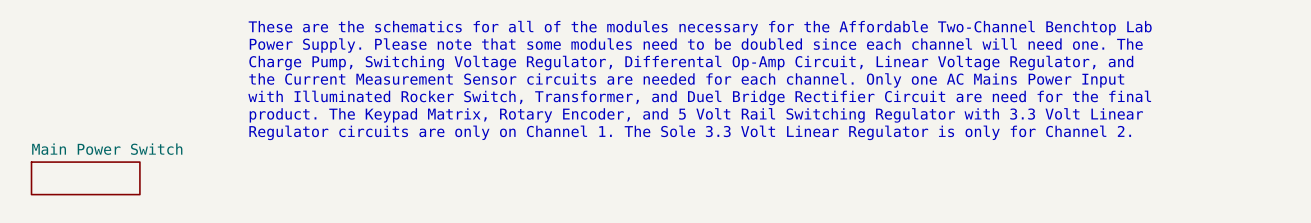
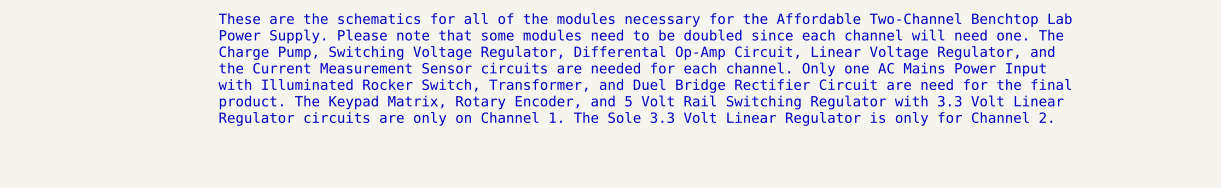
sheet Main Power Switch: (85, 178) -> none

